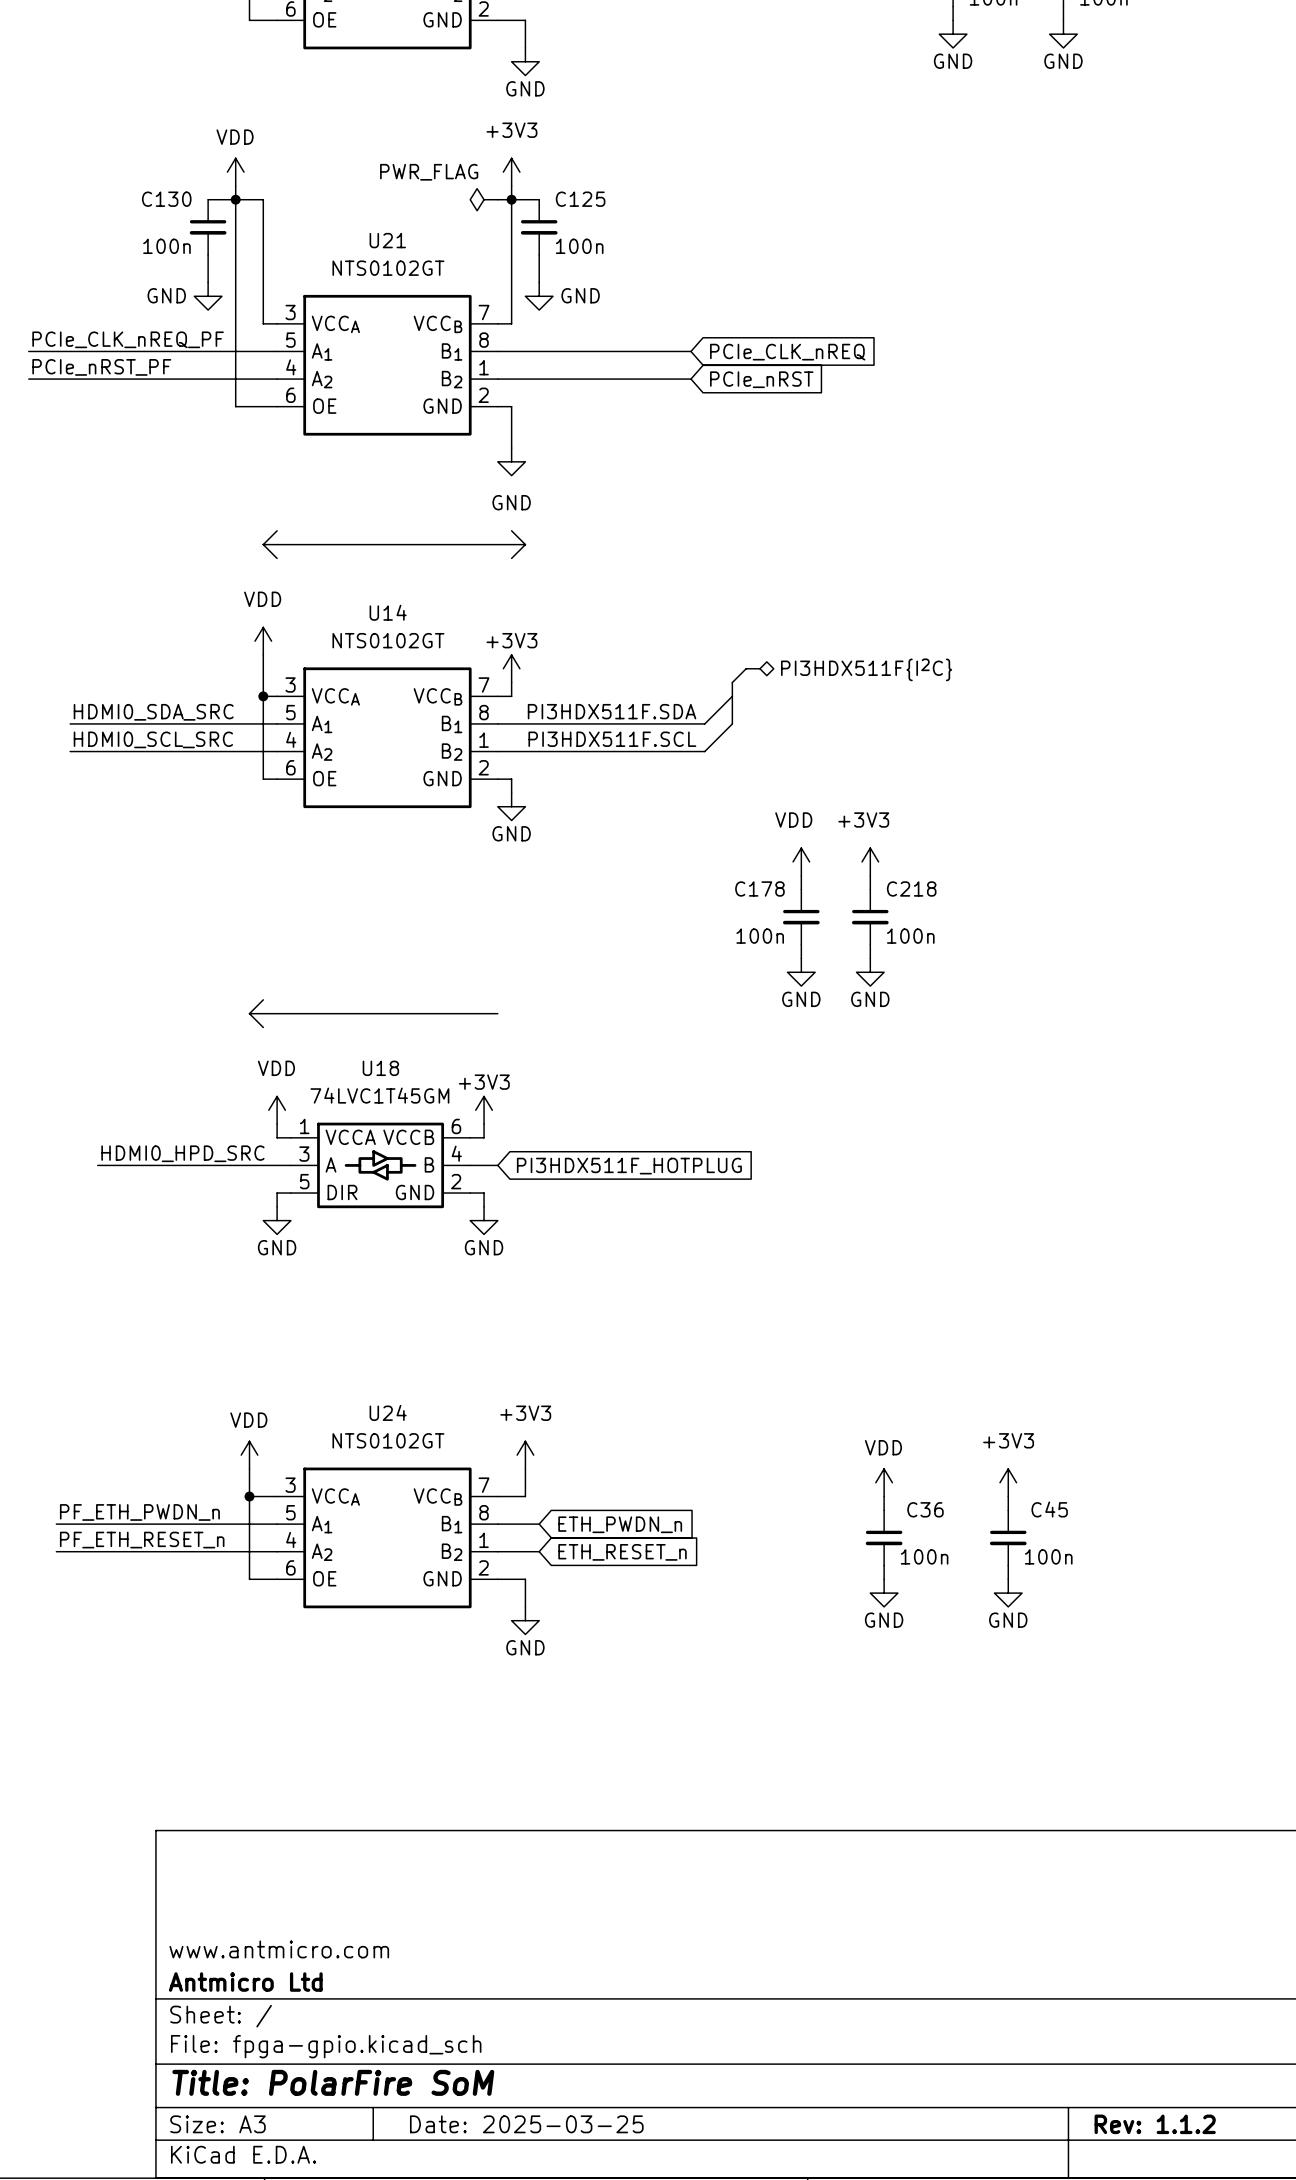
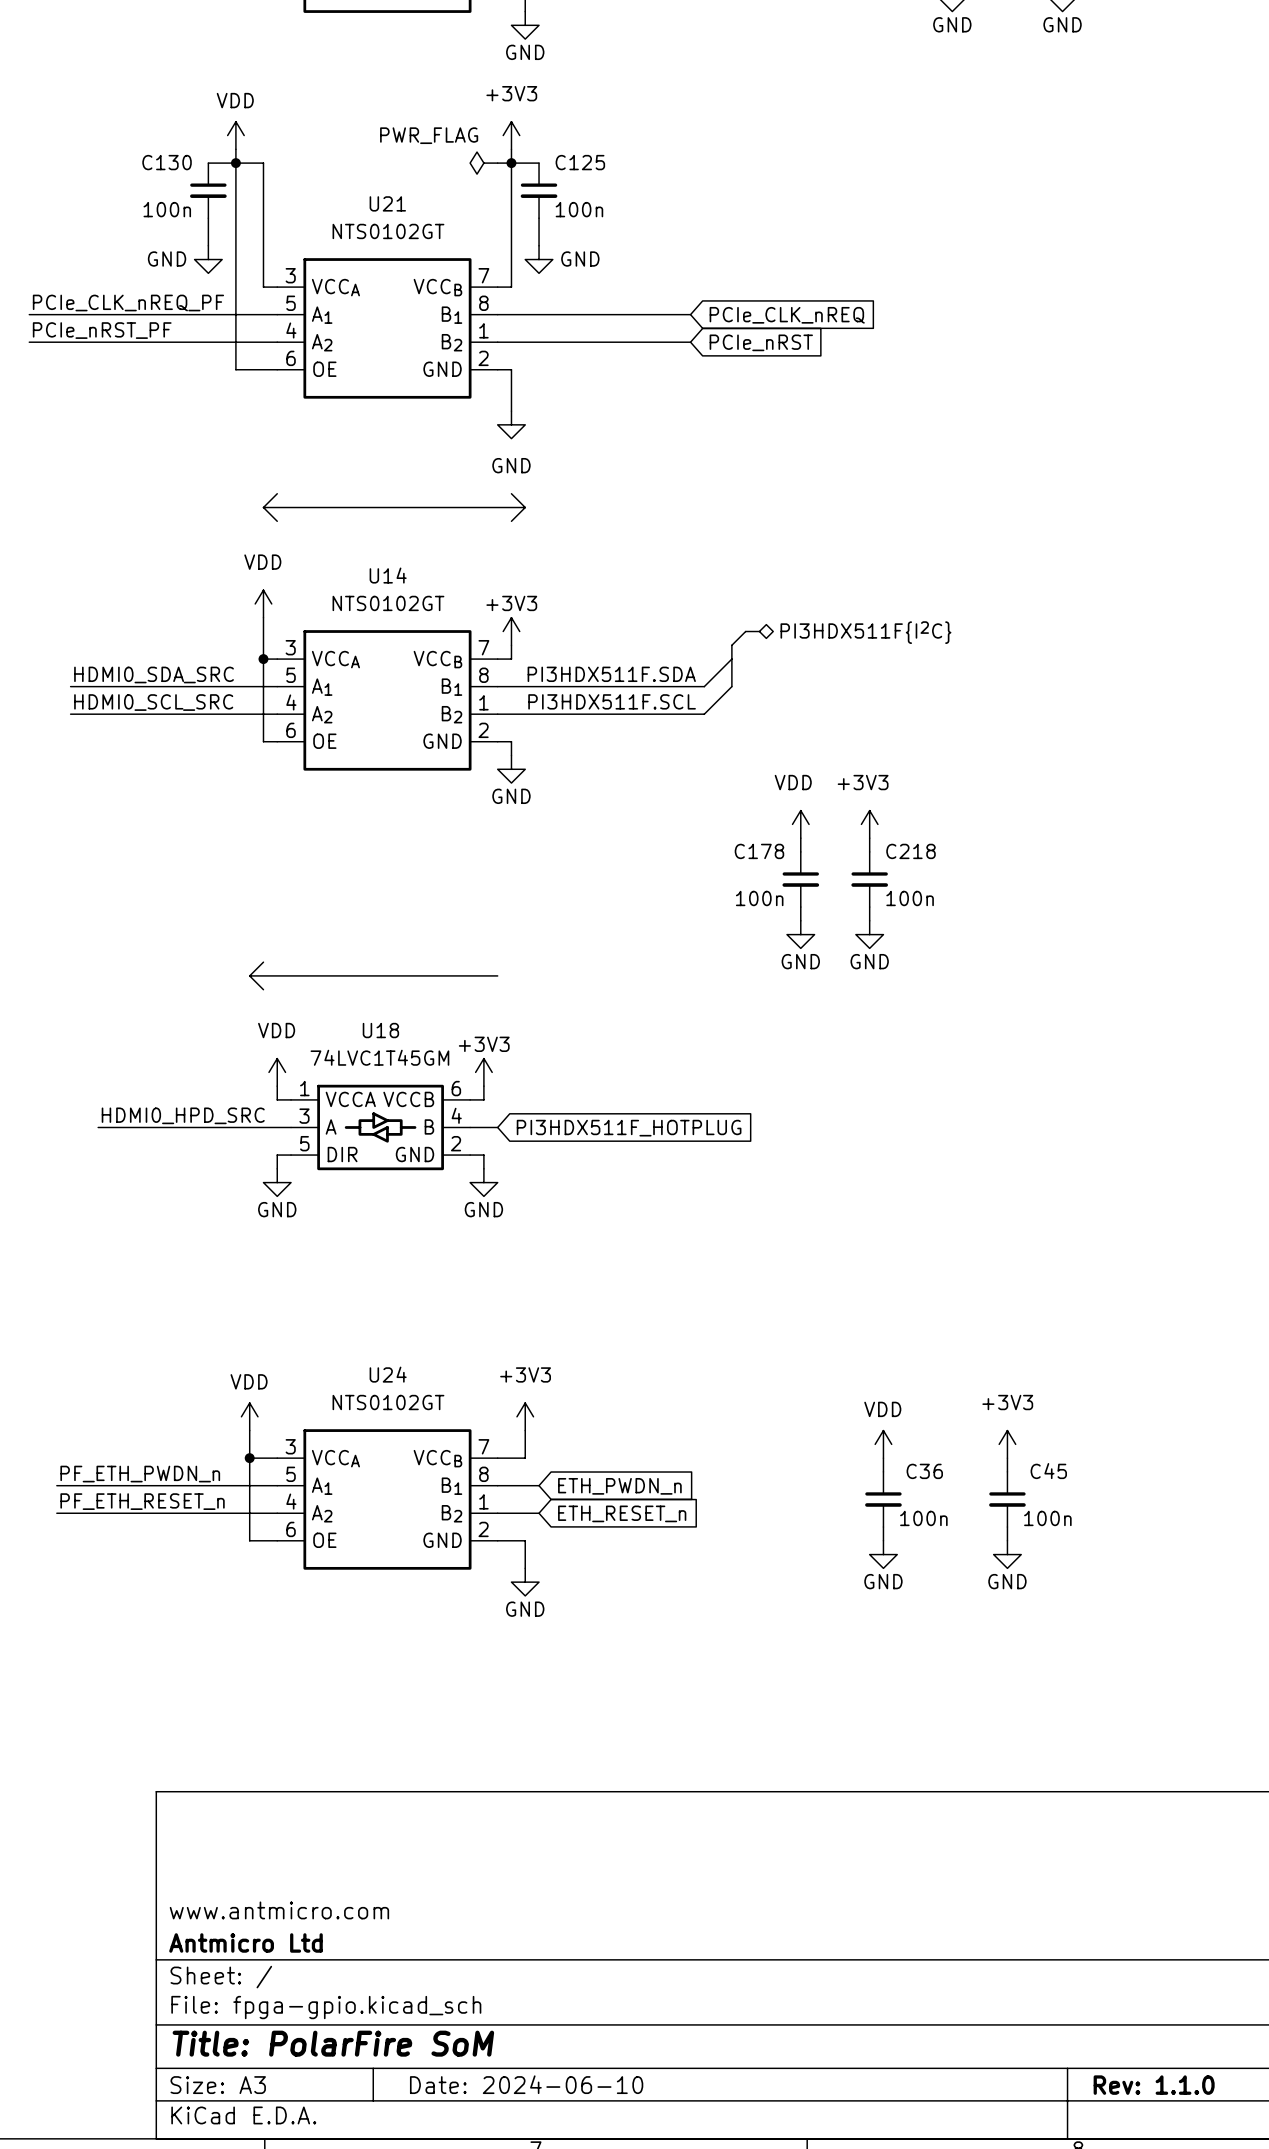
title block: Date: 2025-03-25 (526, 2124) -> Date: 2024-06-10 (526, 2084)
title block: Rev: 1.1.2 (1155, 2124) -> Rev: 1.1.0 (1154, 2085)

